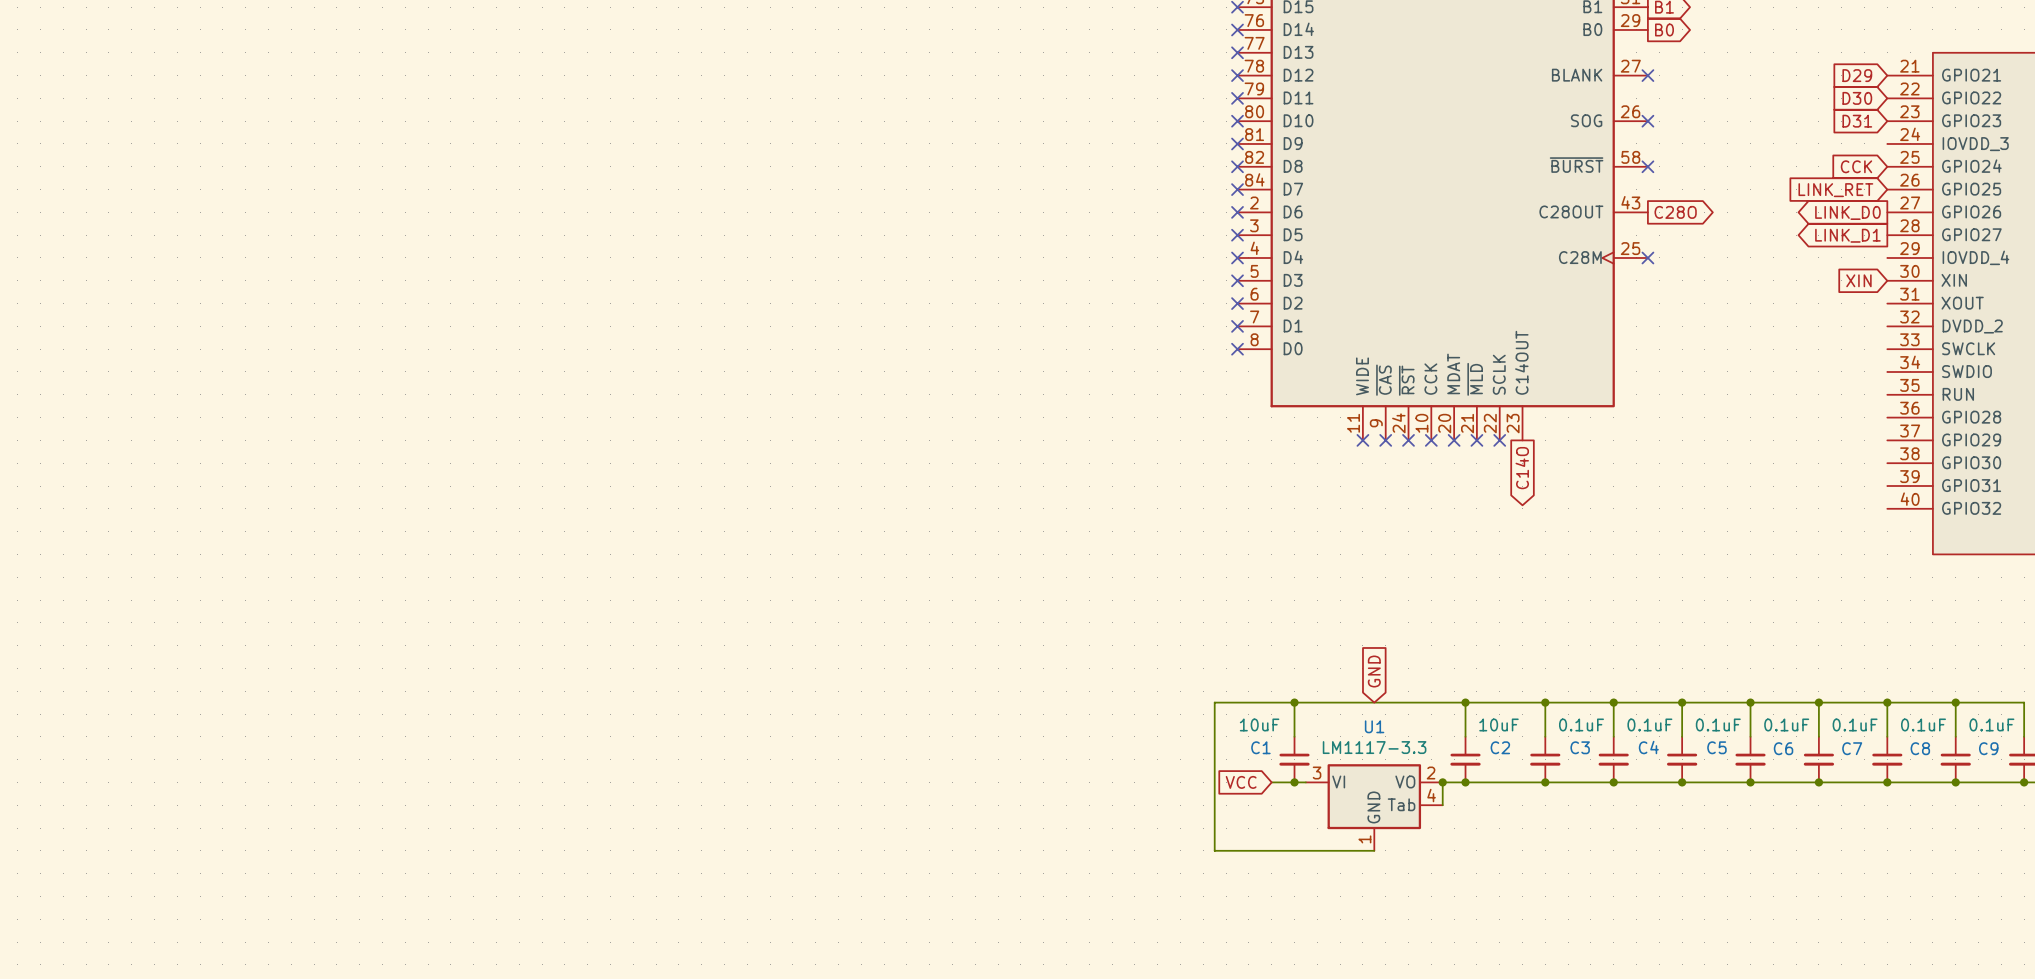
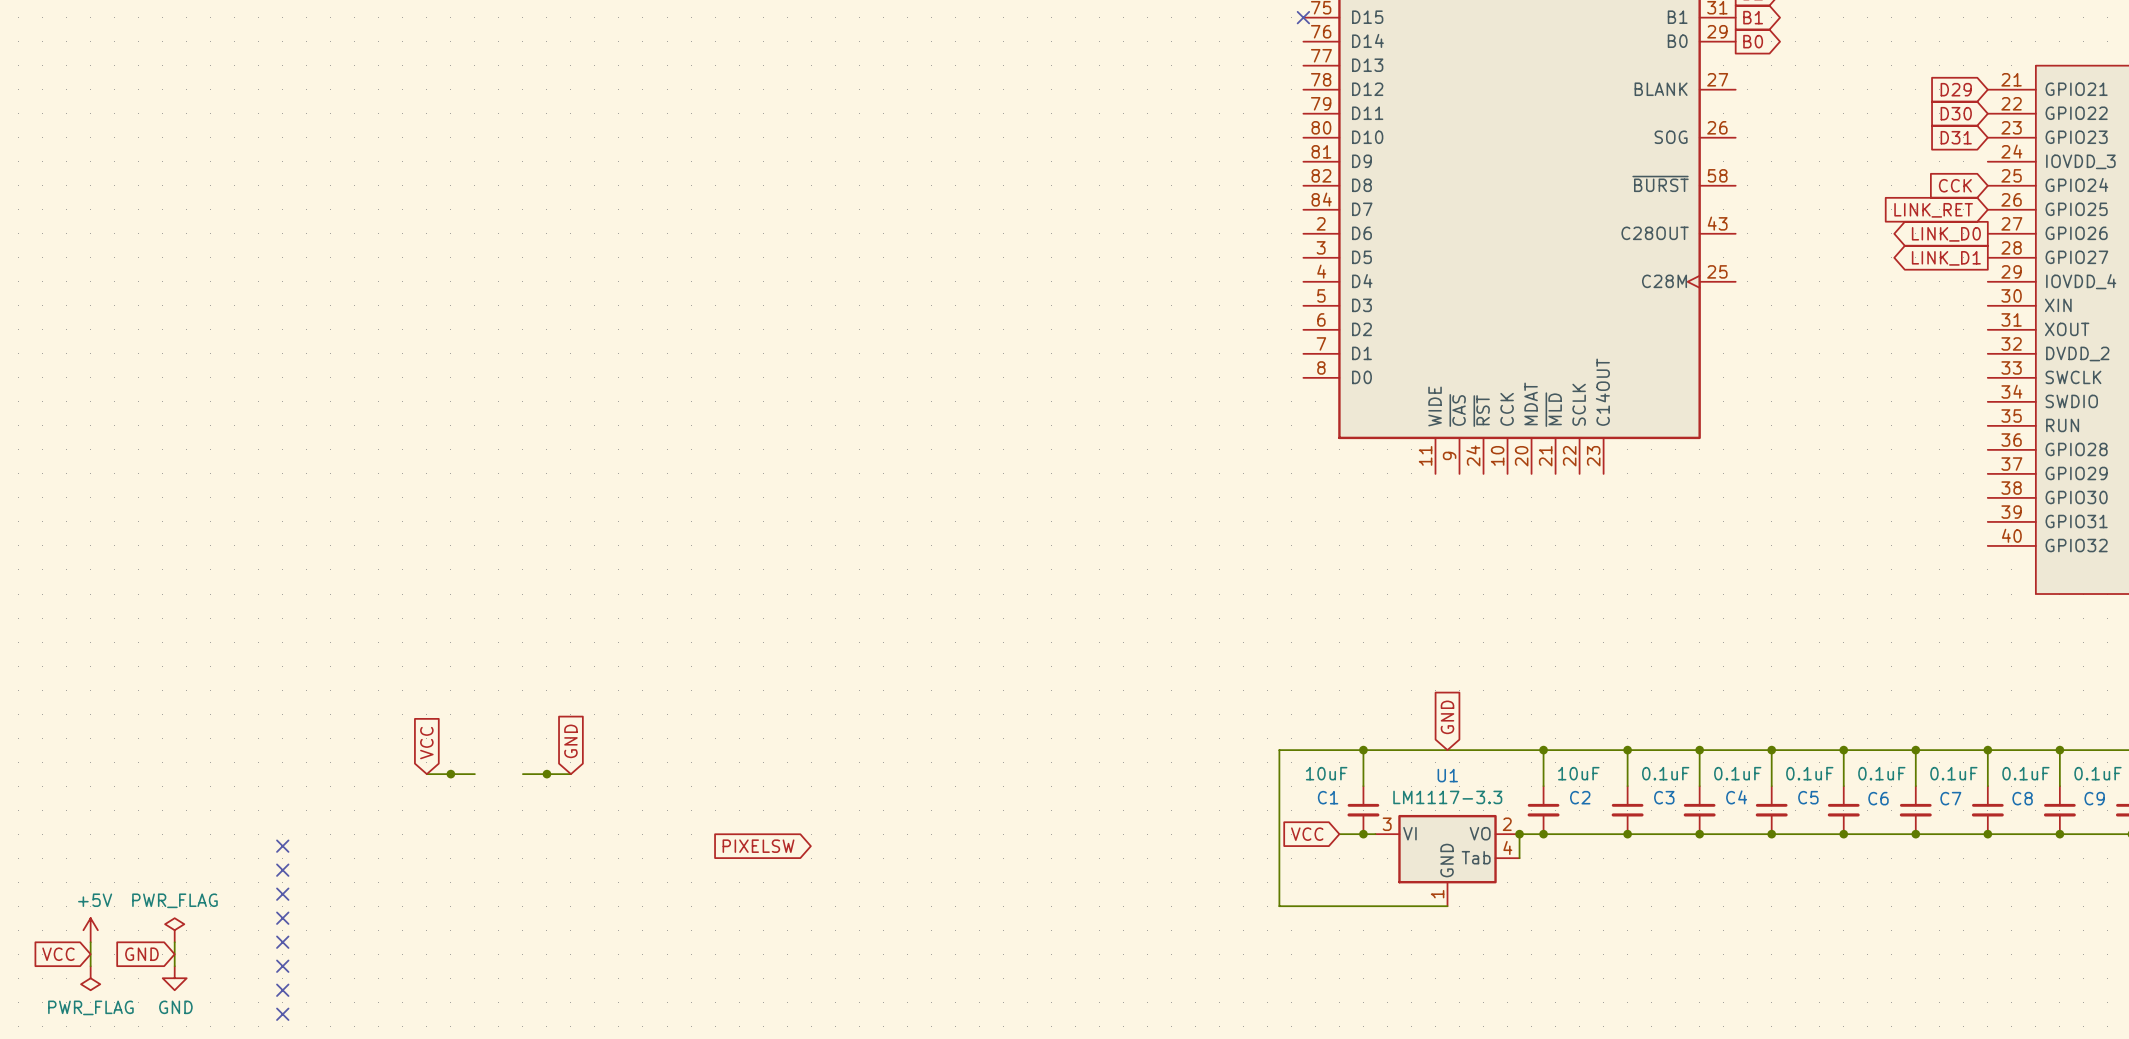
no-connect mark: (1237, 29) -> none
no-connect mark: (1237, 52) -> none
no-connect mark: (1237, 75) -> none
no-connect mark: (1647, 75) -> none
no-connect mark: (1237, 98) -> none
no-connect mark: (1237, 121) -> none
no-connect mark: (1647, 121) -> none
no-connect mark: (1237, 143) -> none
no-connect mark: (1237, 166) -> none
no-connect mark: (1647, 166) -> none
no-connect mark: (1237, 189) -> none
no-connect mark: (1237, 212) -> none
global label: C28O (1675, 212) -> none
no-connect mark: (1237, 235) -> none
no-connect mark: (1237, 257) -> none
no-connect mark: (1647, 257) -> none
no-connect mark: (1237, 280) -> none
global label: XIN (1858, 280) -> none
no-connect mark: (1237, 303) -> none
no-connect mark: (1237, 326) -> none
no-connect mark: (1237, 349) -> none
no-connect mark: (1362, 440) -> none
no-connect mark: (1385, 440) -> none
no-connect mark: (1408, 440) -> none
no-connect mark: (1431, 440) -> none
no-connect mark: (1454, 440) -> none
no-connect mark: (1476, 440) -> none
no-connect mark: (1499, 440) -> none
global label: C14O (1522, 468) -> none
global label: none -> GND (570, 741)
global label: none -> VCC (426, 743)
wire: none -> (426, 774) (474, 774)
junction: none -> (450, 774)
wire: none -> (522, 774) (570, 774)
junction: none -> (546, 774)
no-connect mark: none -> (282, 846)
global label: none -> PIXELSW (758, 846)
no-connect mark: none -> (282, 870)
no-connect mark: none -> (282, 894)
no-connect mark: none -> (282, 918)
power symbol: none -> +5V (90, 930)
power symbol: none -> PWR_FLAG (174, 930)
wire: none -> (90, 942) (90, 966)
wire: none -> (174, 942) (174, 966)
no-connect mark: none -> (282, 942)
global label: none -> VCC (58, 954)
global label: none -> GND (141, 954)
no-connect mark: none -> (282, 966)
power symbol: none -> PWR_FLAG (90, 978)
power symbol: none -> GND (174, 978)
no-connect mark: none -> (282, 990)
no-connect mark: none -> (282, 1014)

